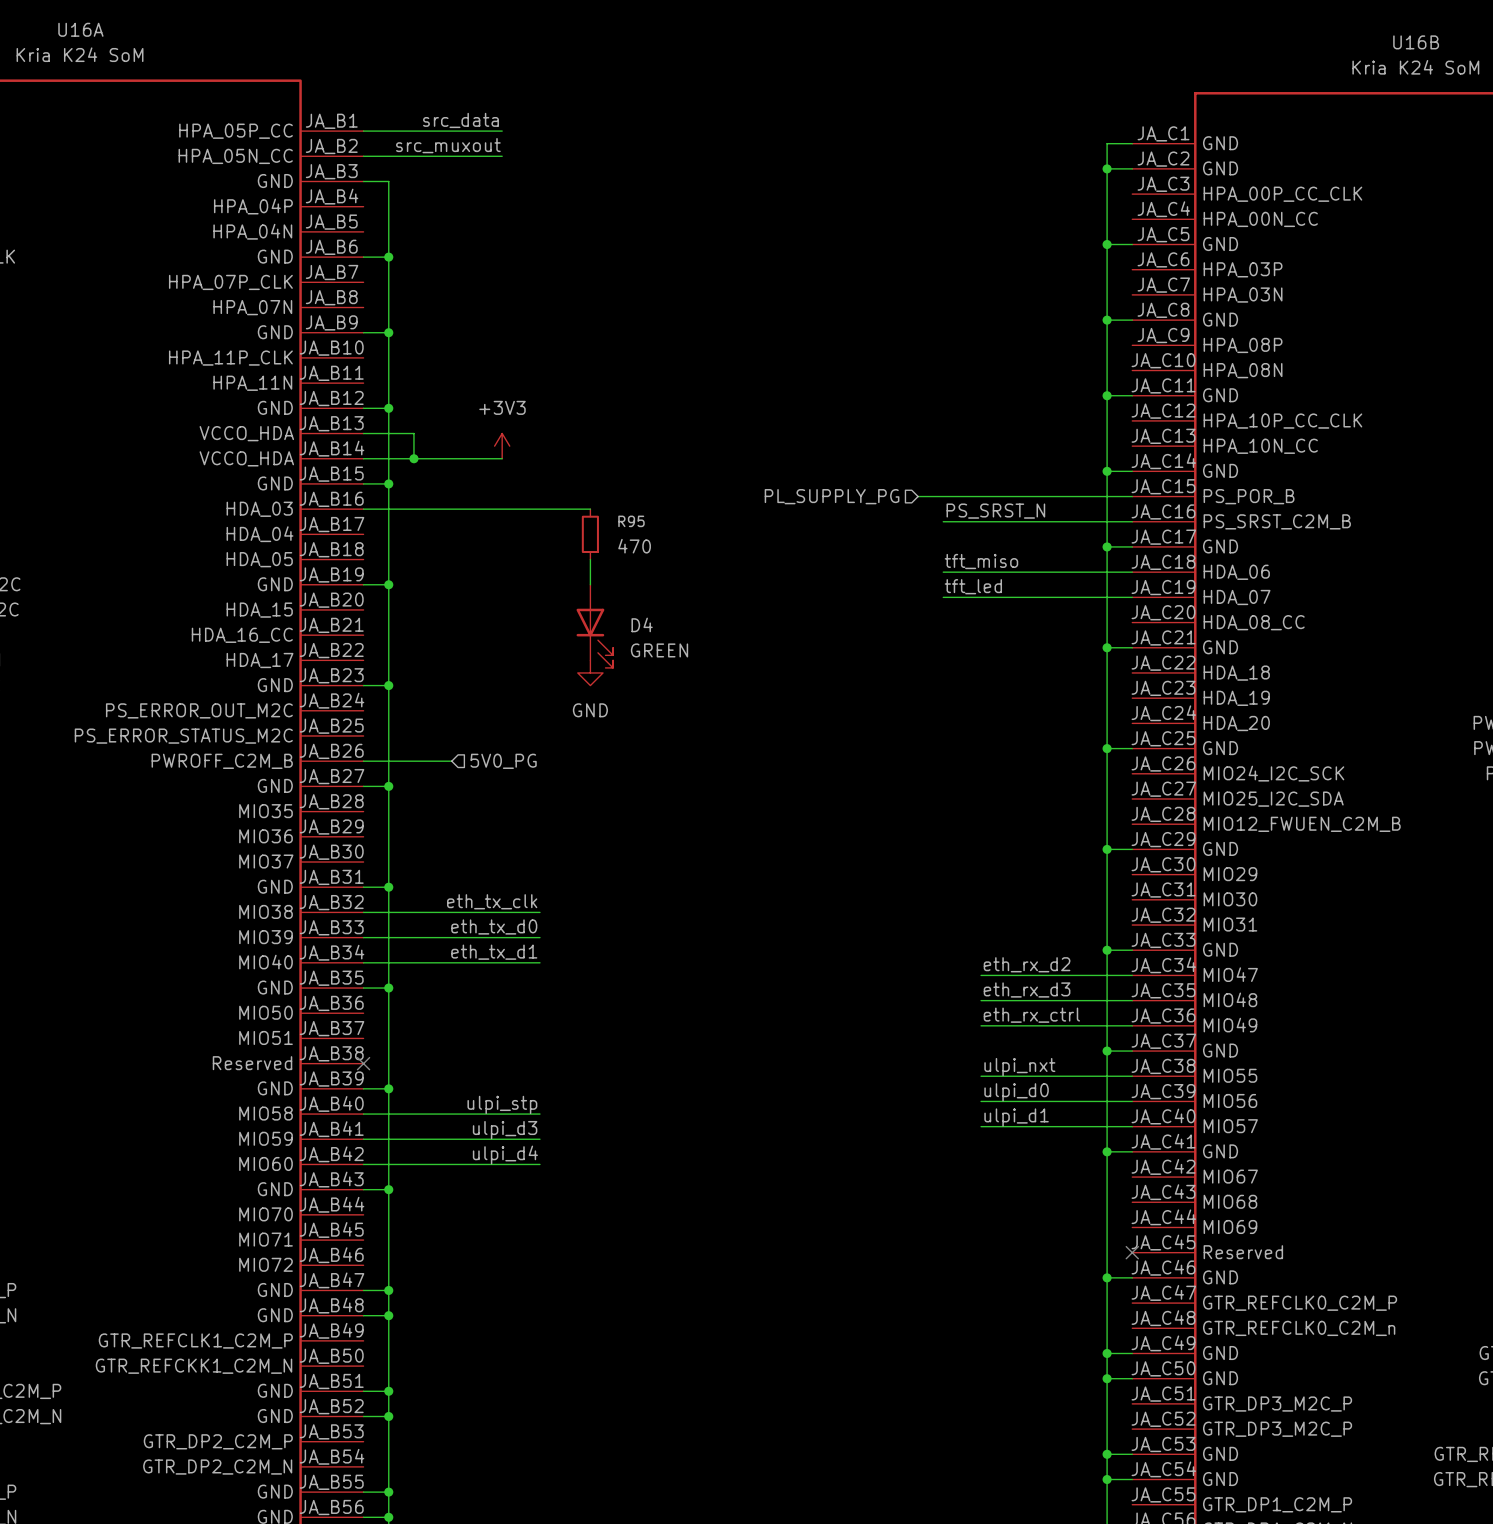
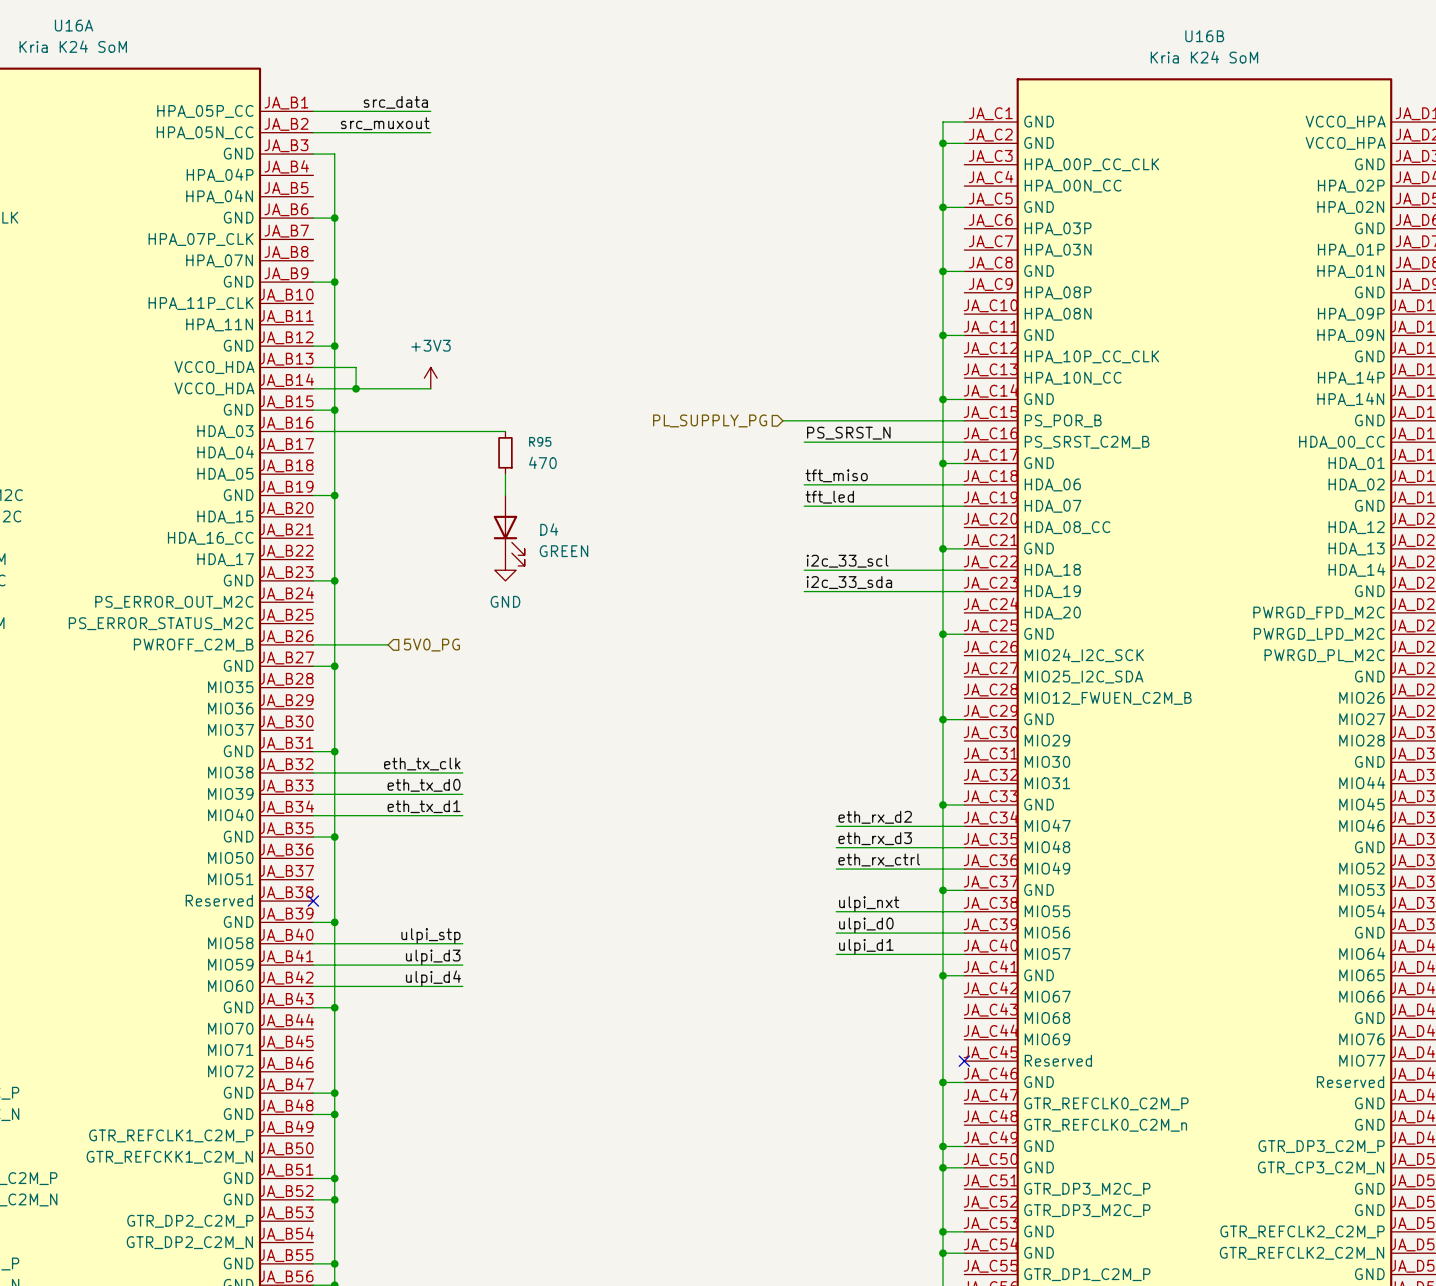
label: none -> i2c_33_scl (847, 561)
wire: none -> (804, 570) (964, 570)
label: none -> i2c_33_sda (849, 582)
wire: none -> (804, 591) (964, 591)

